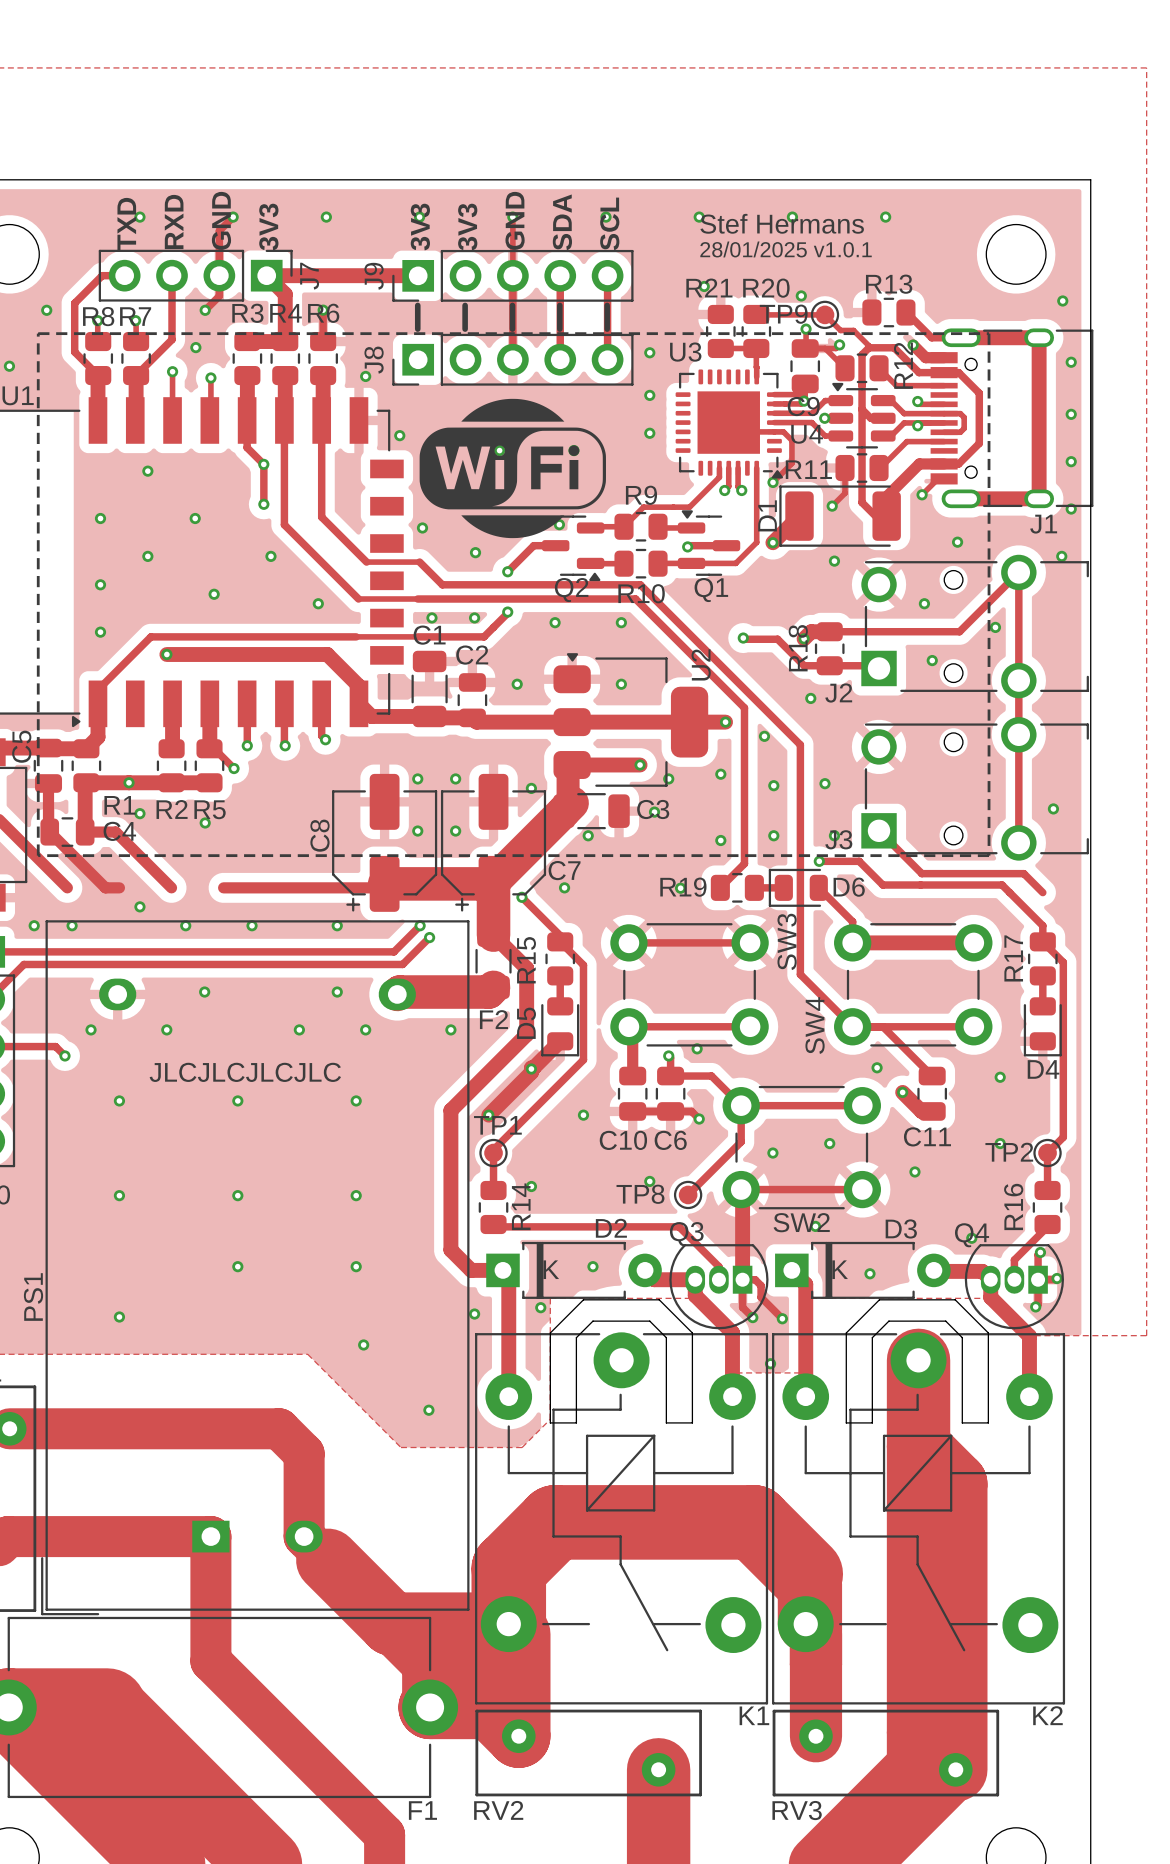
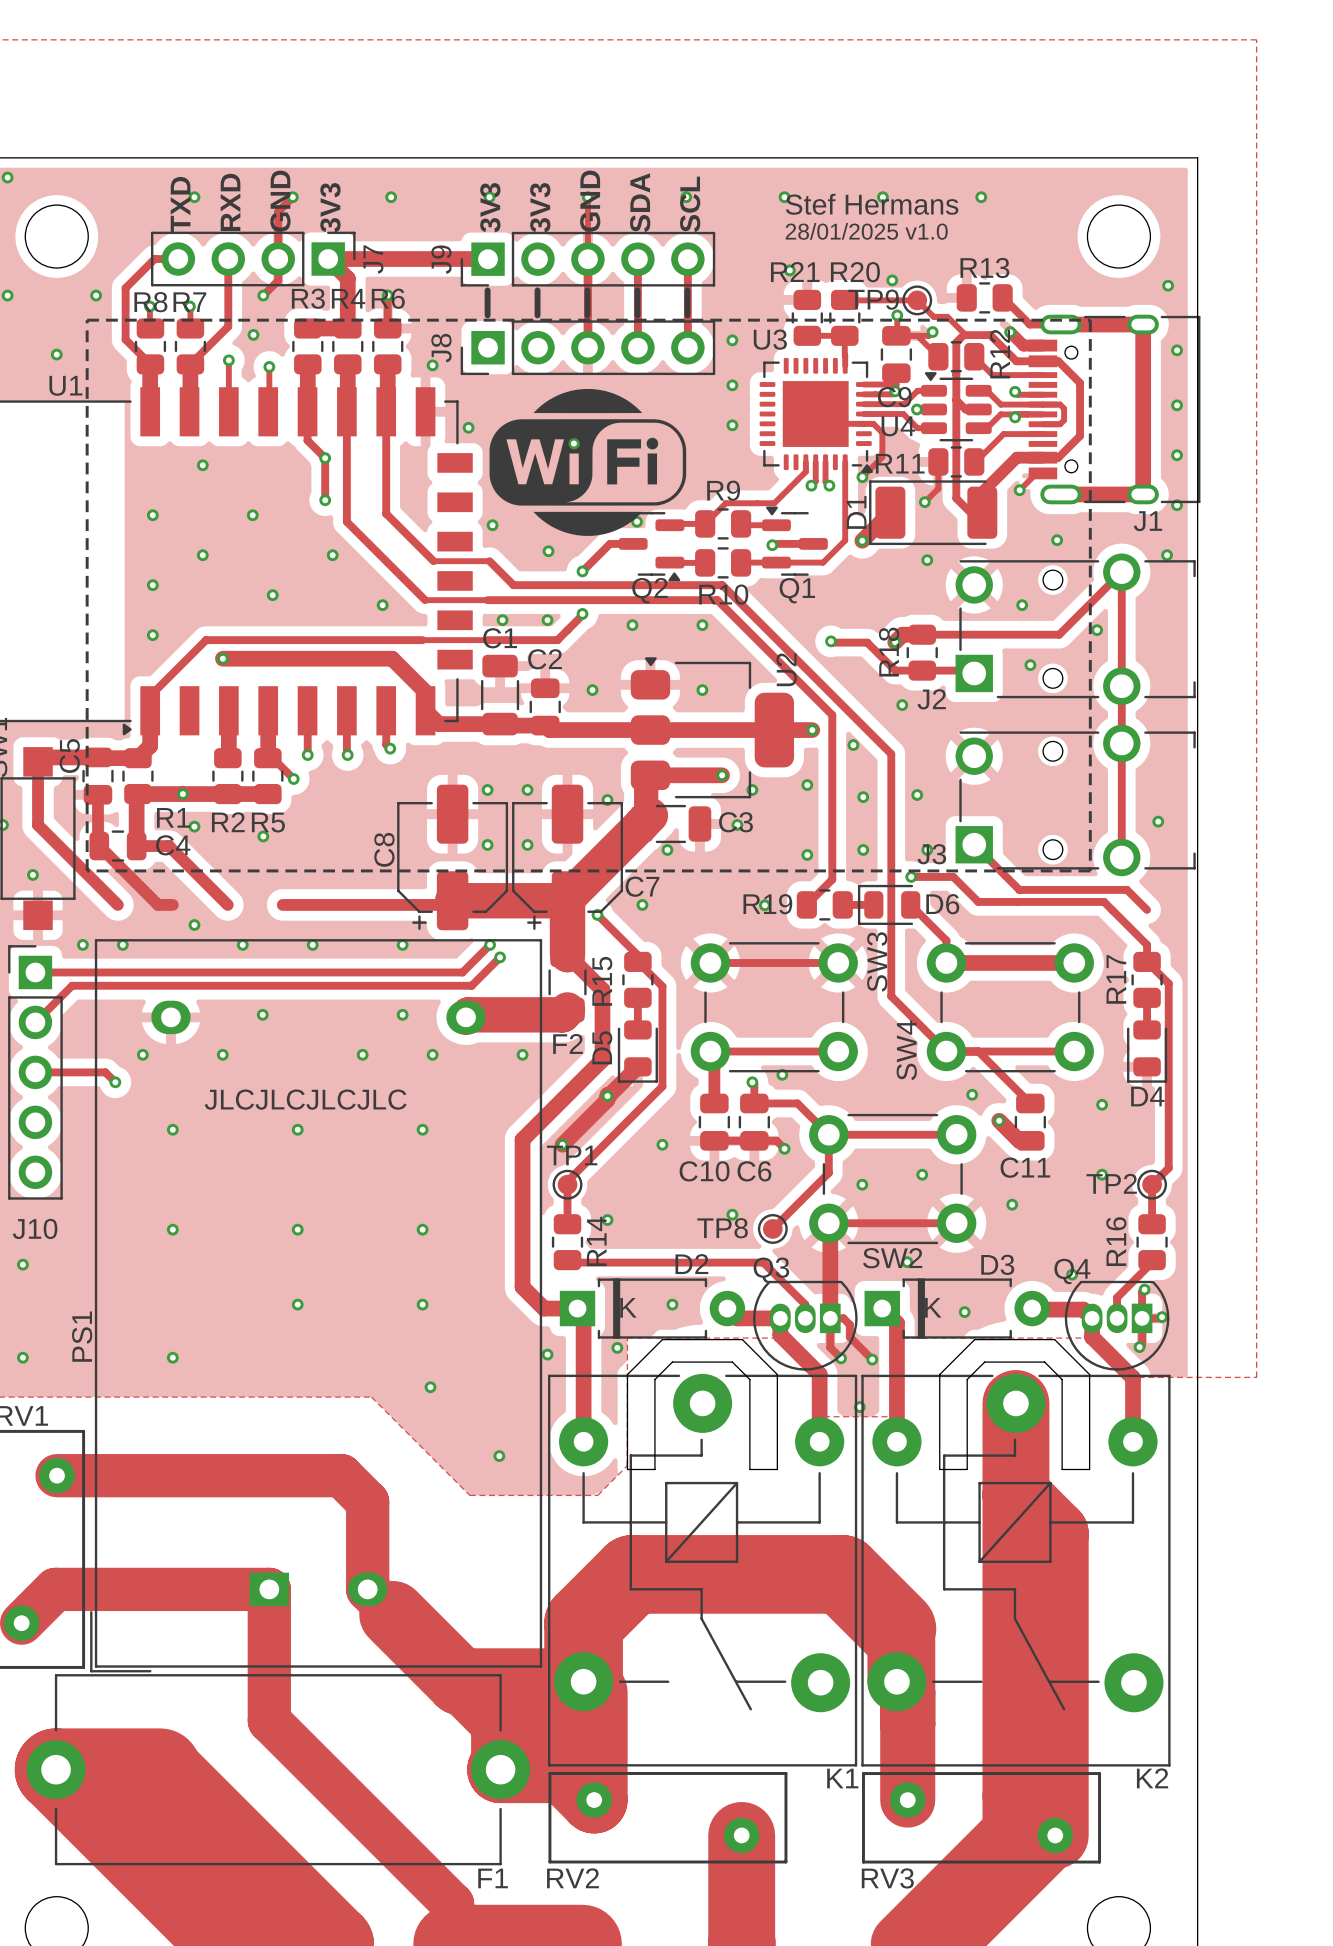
text: 28/01/2025 v1.0.1 (786, 249) -> 28/01/2025 v1.0 (866, 231)

